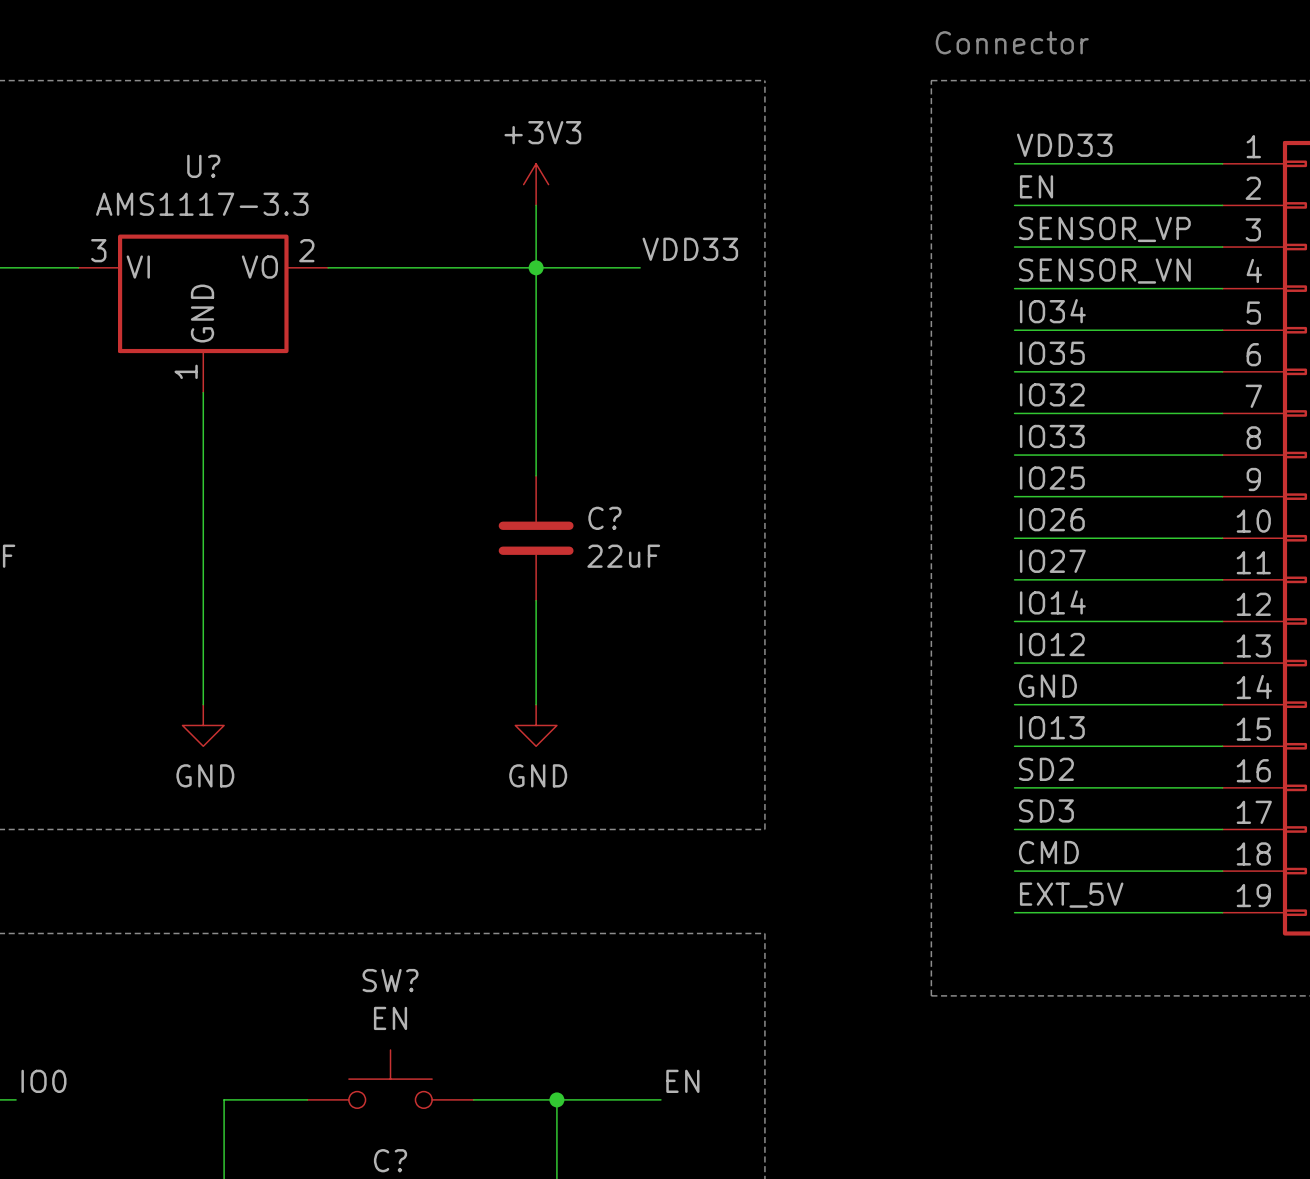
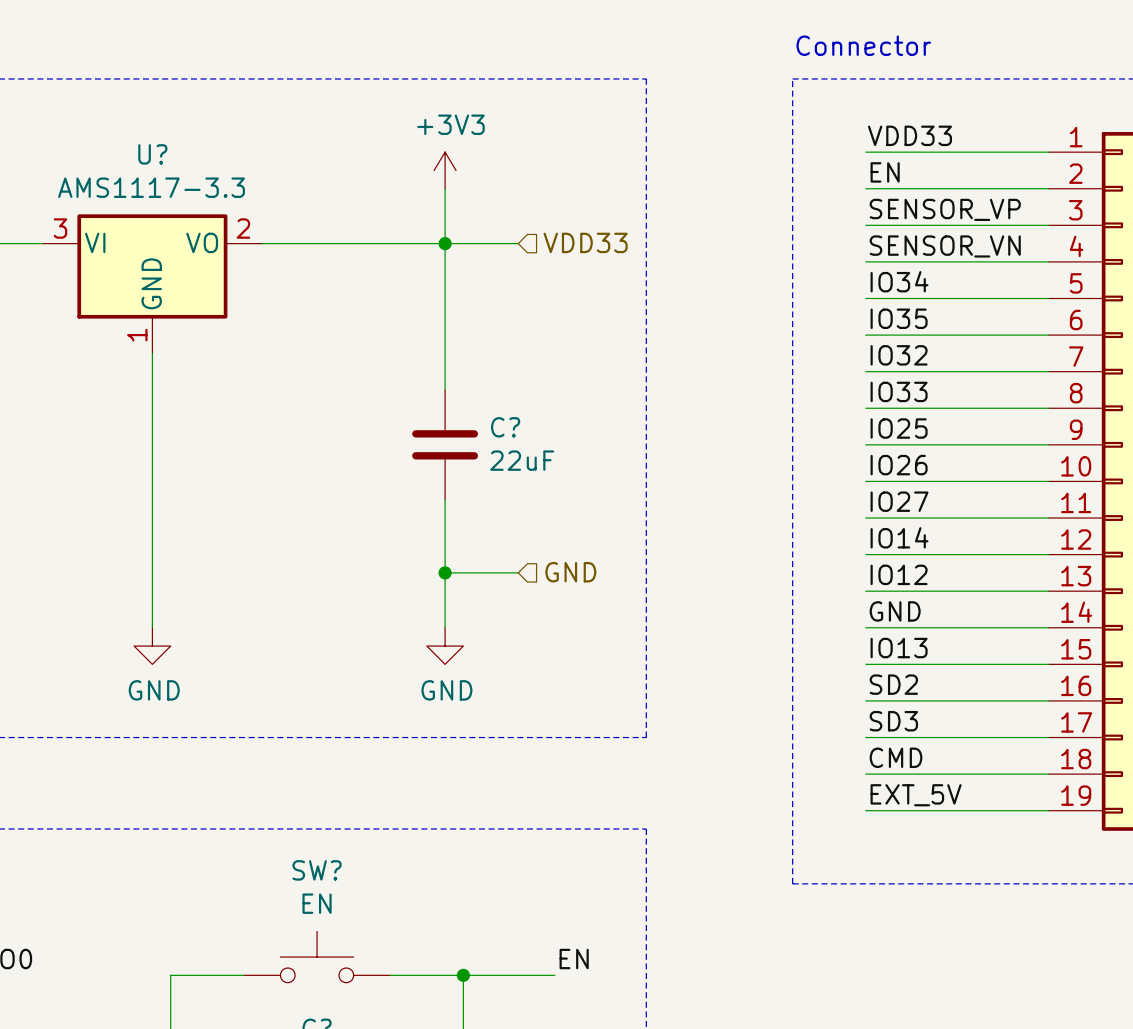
label: VDD33 (690, 249) -> none
wire: (619, 267) (640, 267) -> none
hierarchical label: none -> VDD33 (585, 242)
C? position: (536, 538) -> (445, 444)
hierarchical label: none -> GND (570, 572)
wire: none -> (445, 572) (518, 572)
junction: none -> (445, 572)

